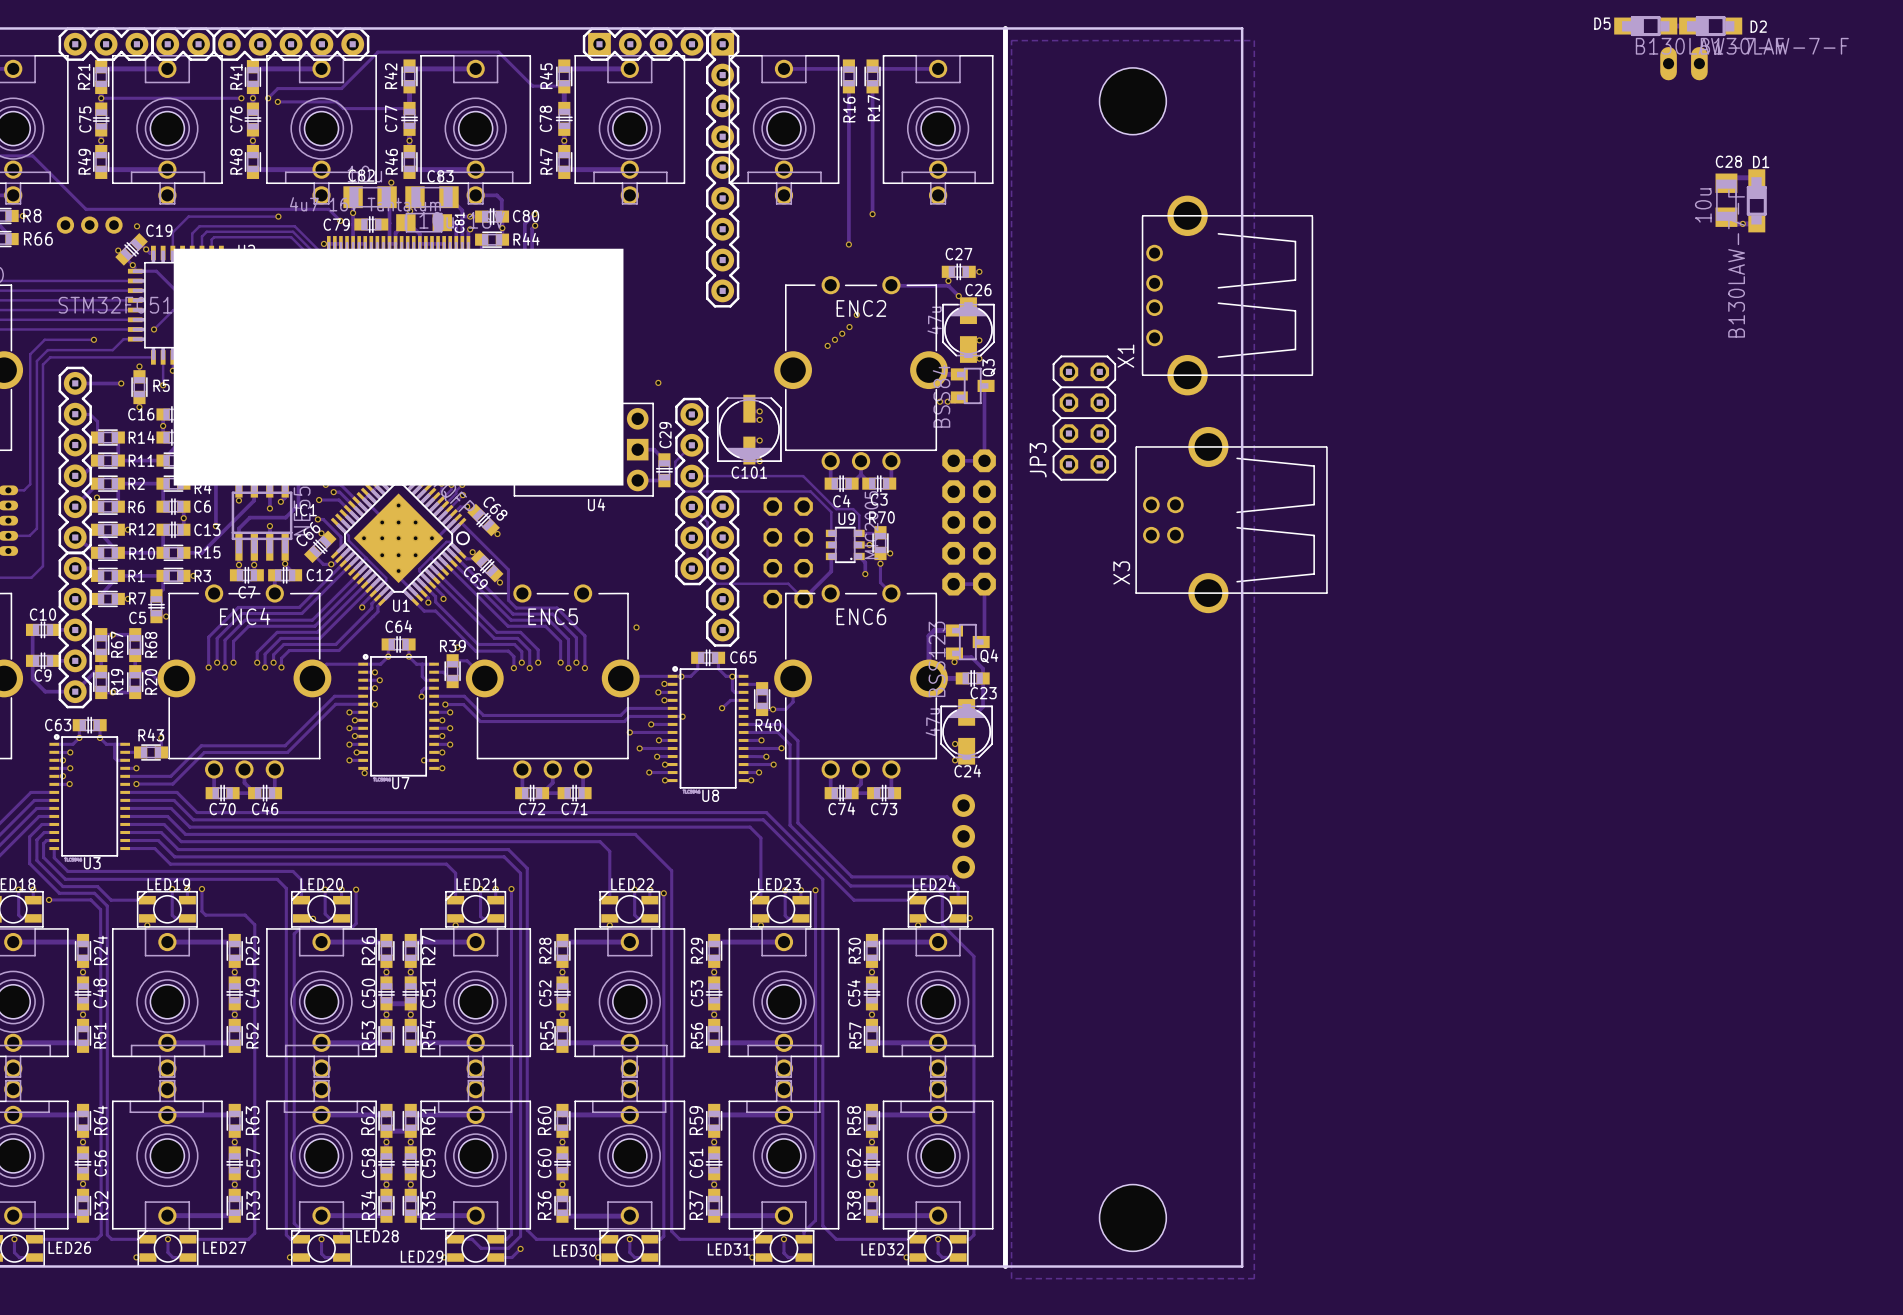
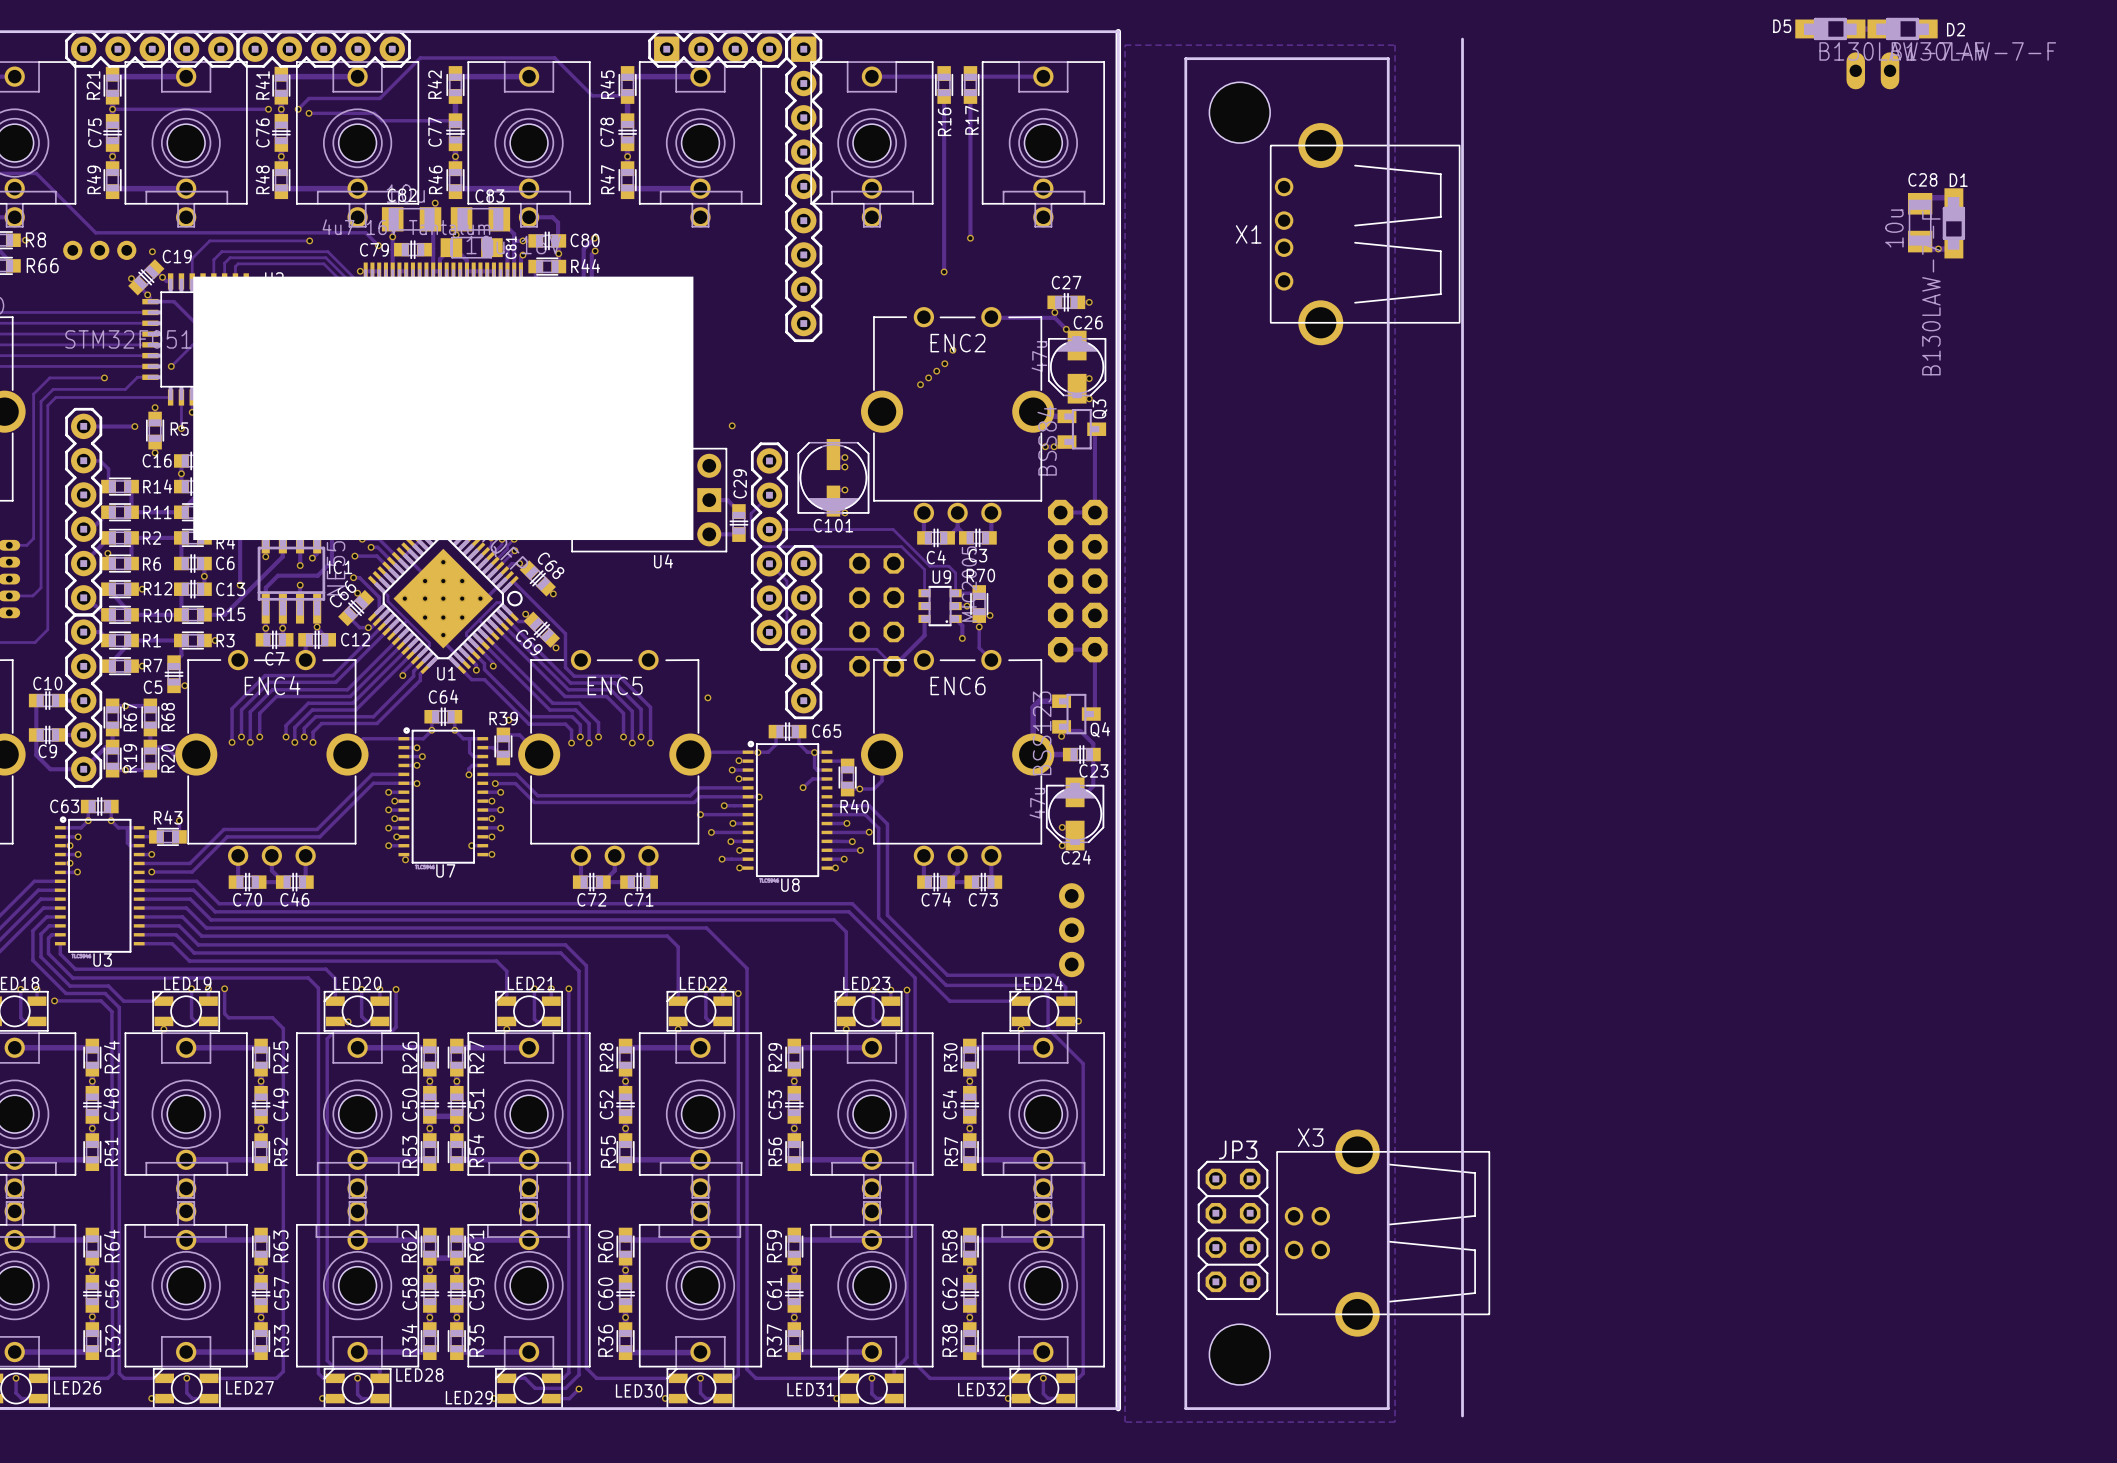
board edge: (1005, 28) (1242, 28) (1242, 1266) -> (1118, 31) (1118, 1408)
board edge: none -> (1462, 39) (1462, 1416)
hole: none -> (1239, 112)
hole: (1132, 101) -> none
X1 position: (1227, 295) -> (1365, 234)
X1 name rotation: 0° (1125, 356) -> 90° clockwise (1248, 234)
X1 name position: X1 (1125, 356) -> X1 (1248, 234)
JP3 position: (1084, 418) -> (1233, 1230)
JP3 name rotation: 0° (1038, 460) -> 90° clockwise (1238, 1149)
JP3 name position: JP3 (1038, 460) -> JP3 (1238, 1149)
X3 position: (1231, 520) -> (1383, 1233)
X3 name rotation: 0° (1121, 572) -> 90° clockwise (1310, 1137)
X3 name position: X3 (1121, 572) -> X3 (1310, 1137)
hole: none -> (1239, 1354)
hole: (1132, 1217) -> none
board edge: (1005, 1266) (1066, 1266) -> (1381, 1408) (1388, 1408) (1388, 58) (1185, 58) (1185, 1408)

